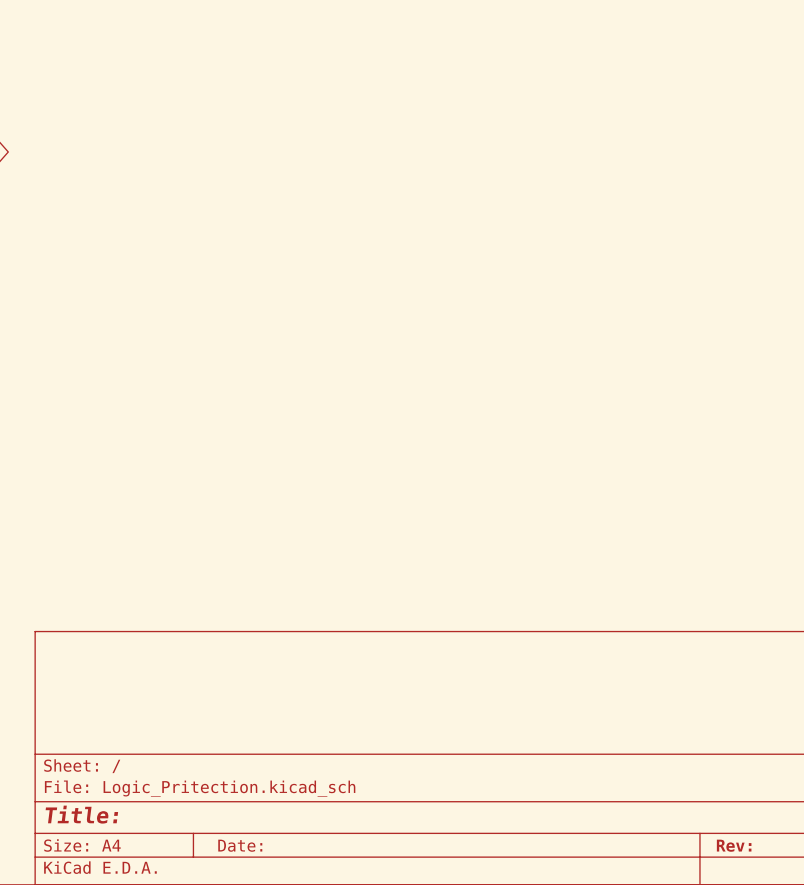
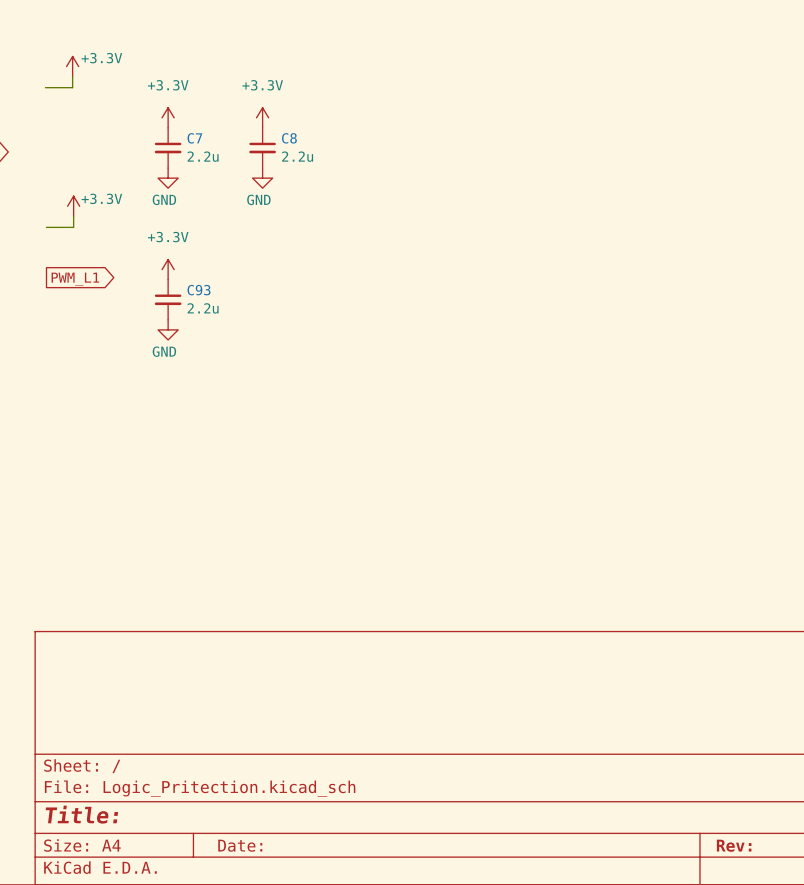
power symbol: none -> +3.3V (72, 66)
wire: none -> (72, 76) (72, 87) (45, 87)
power symbol: none -> +3.3V (168, 117)
power symbol: none -> +3.3V (262, 117)
C7: none -> 2.2u (168, 147)
C8: none -> 2.2u (262, 147)
power symbol: none -> GND (168, 178)
power symbol: none -> GND (262, 178)
power symbol: none -> +3.3V (73, 206)
wire: none -> (73, 216) (73, 227) (46, 227)
power symbol: none -> +3.3V (168, 269)
global label: none -> PWM_L1 (75, 279)
C93: none -> 2.2u (168, 299)
power symbol: none -> GND (168, 329)

